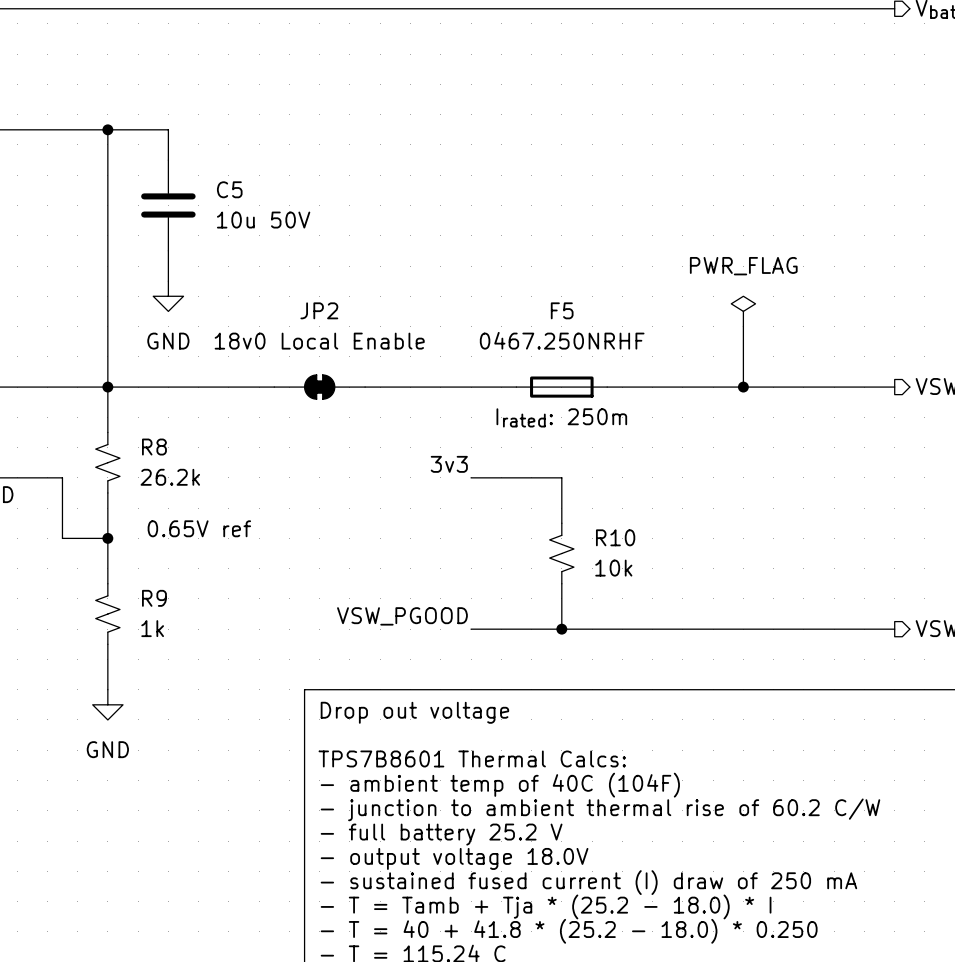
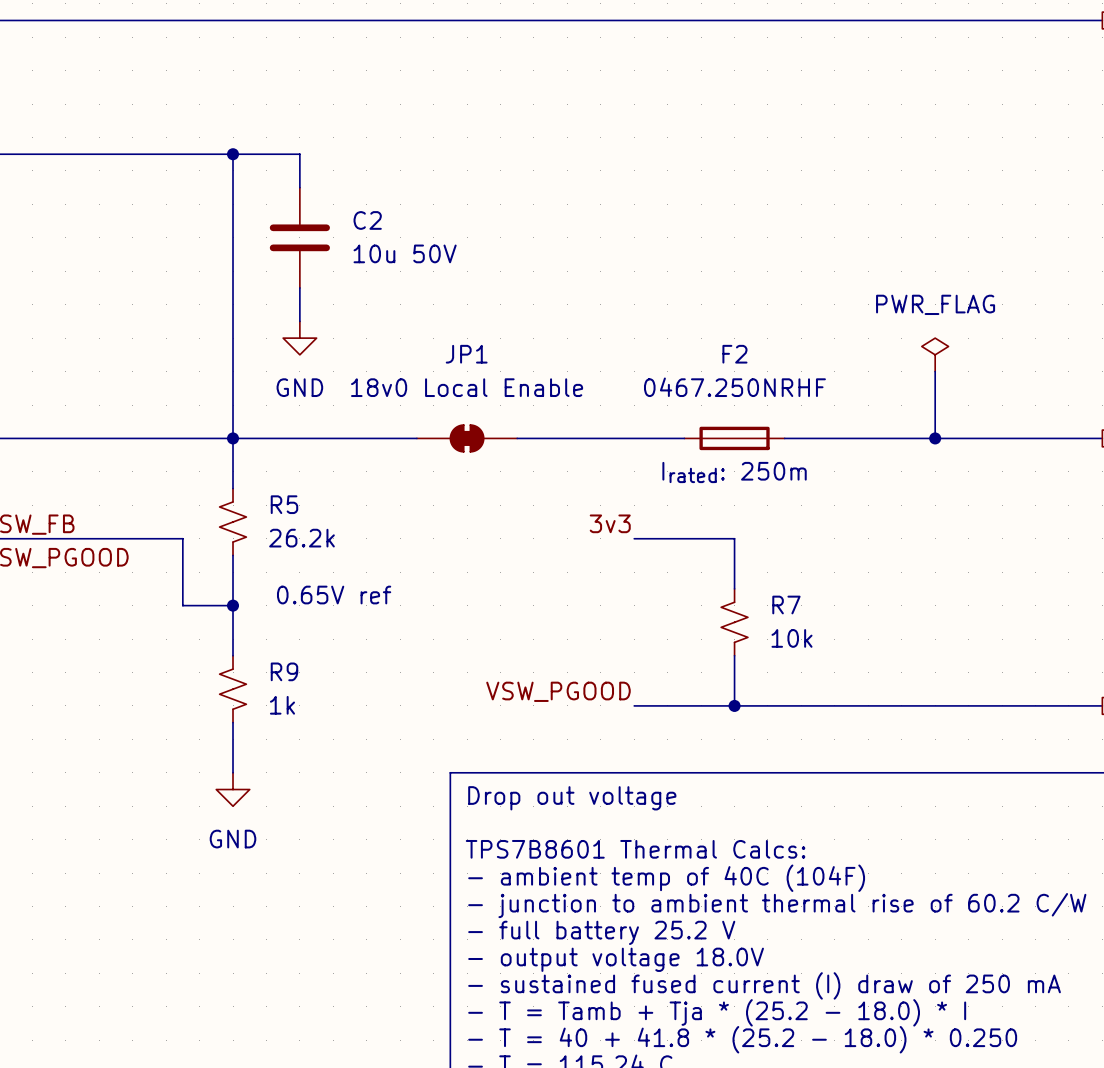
C5 name: C5 (229, 189) -> C2 (367, 220)
JP2 name: JP2 (319, 310) -> JP1 (466, 354)
F5 name: F5 (562, 310) -> F2 (734, 354)
R8 name: R8 (154, 447) -> R5 (284, 504)
R10 name: R10 (615, 537) -> R7 (786, 604)

